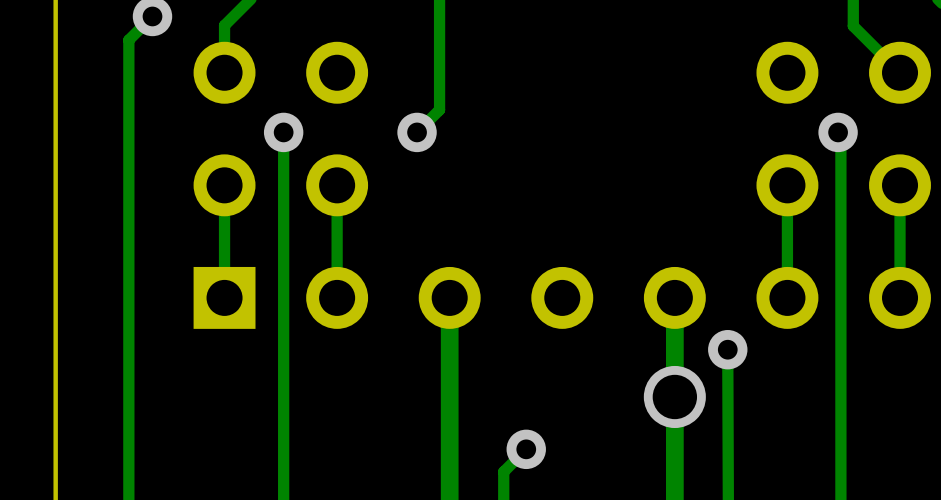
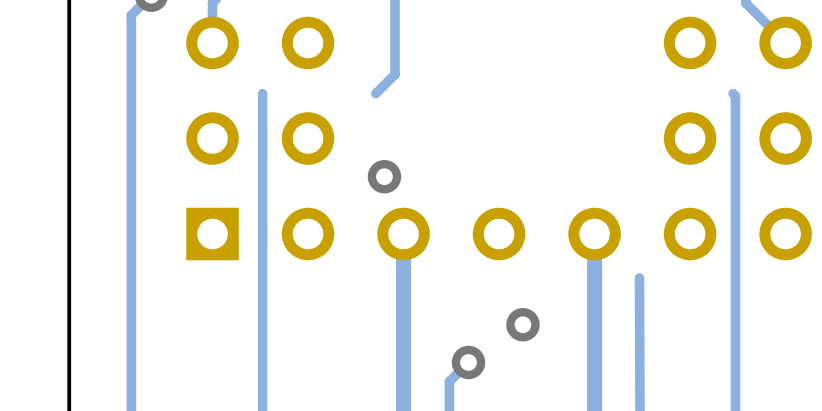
via: (283, 132) -> none
via: (417, 132) -> none
via: (838, 132) -> none
track: (224, 185) (224, 297) -> none
track: (337, 185) (337, 297) -> none
track: (787, 185) (787, 297) -> none
track: (900, 185) (900, 297) -> none
via: none -> (384, 176)
via: (727, 349) -> none
via: (674, 396) -> none
via: none -> (522, 324)

